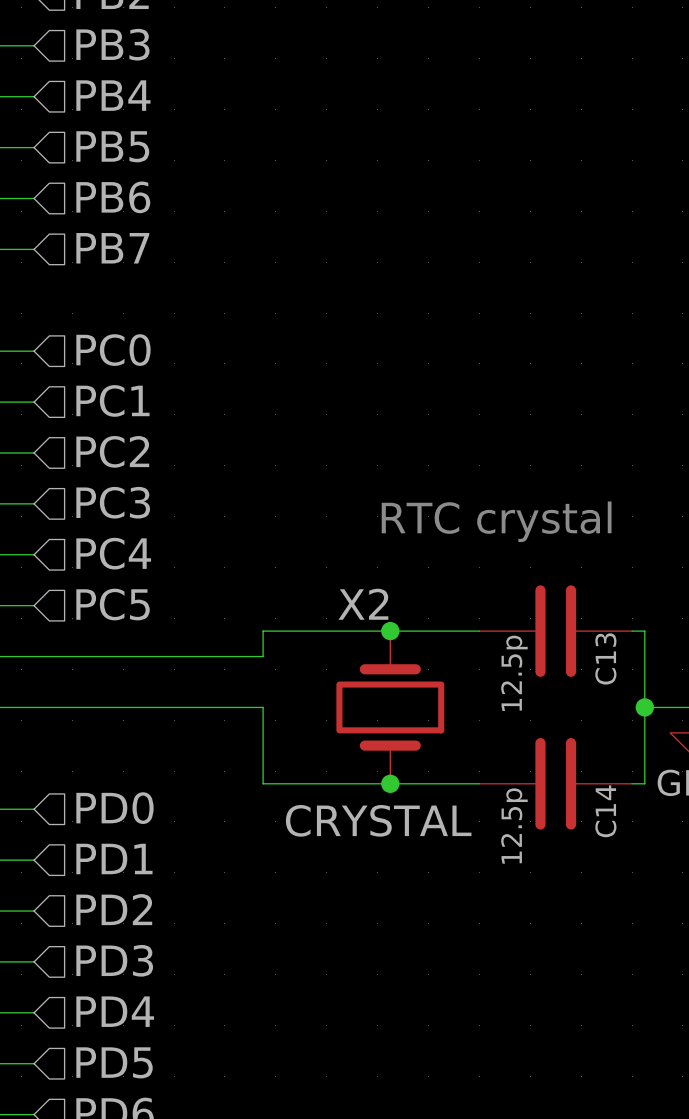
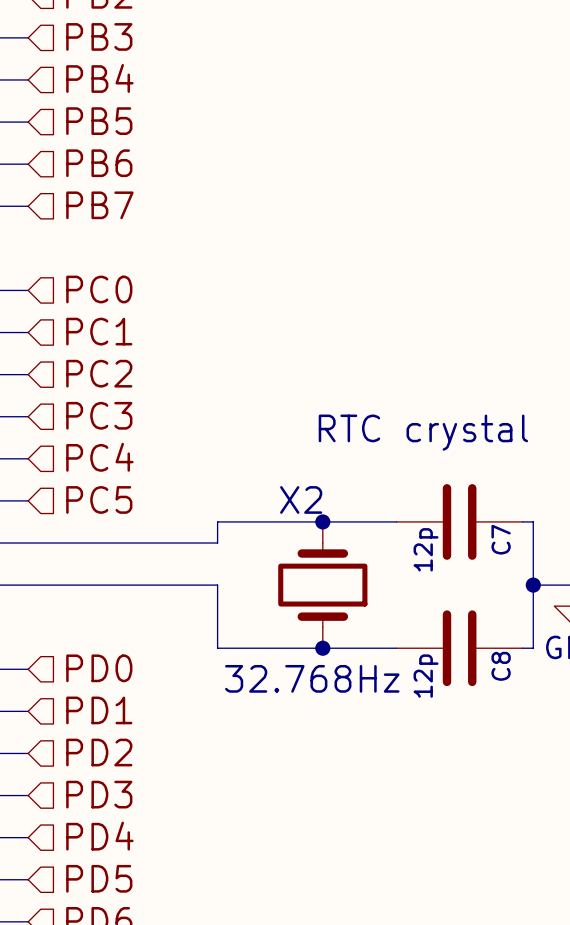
C13 name: C13 (605, 658) -> C7 (501, 539)
C13 value: 12.5p (514, 673) -> 12p (426, 549)
C14 name: C14 (605, 811) -> C8 (501, 666)
X2 value: CRYSTAL (378, 820) -> 32.768Hz (312, 678)
C14 value: 12.5p (514, 826) -> 12p (426, 676)

